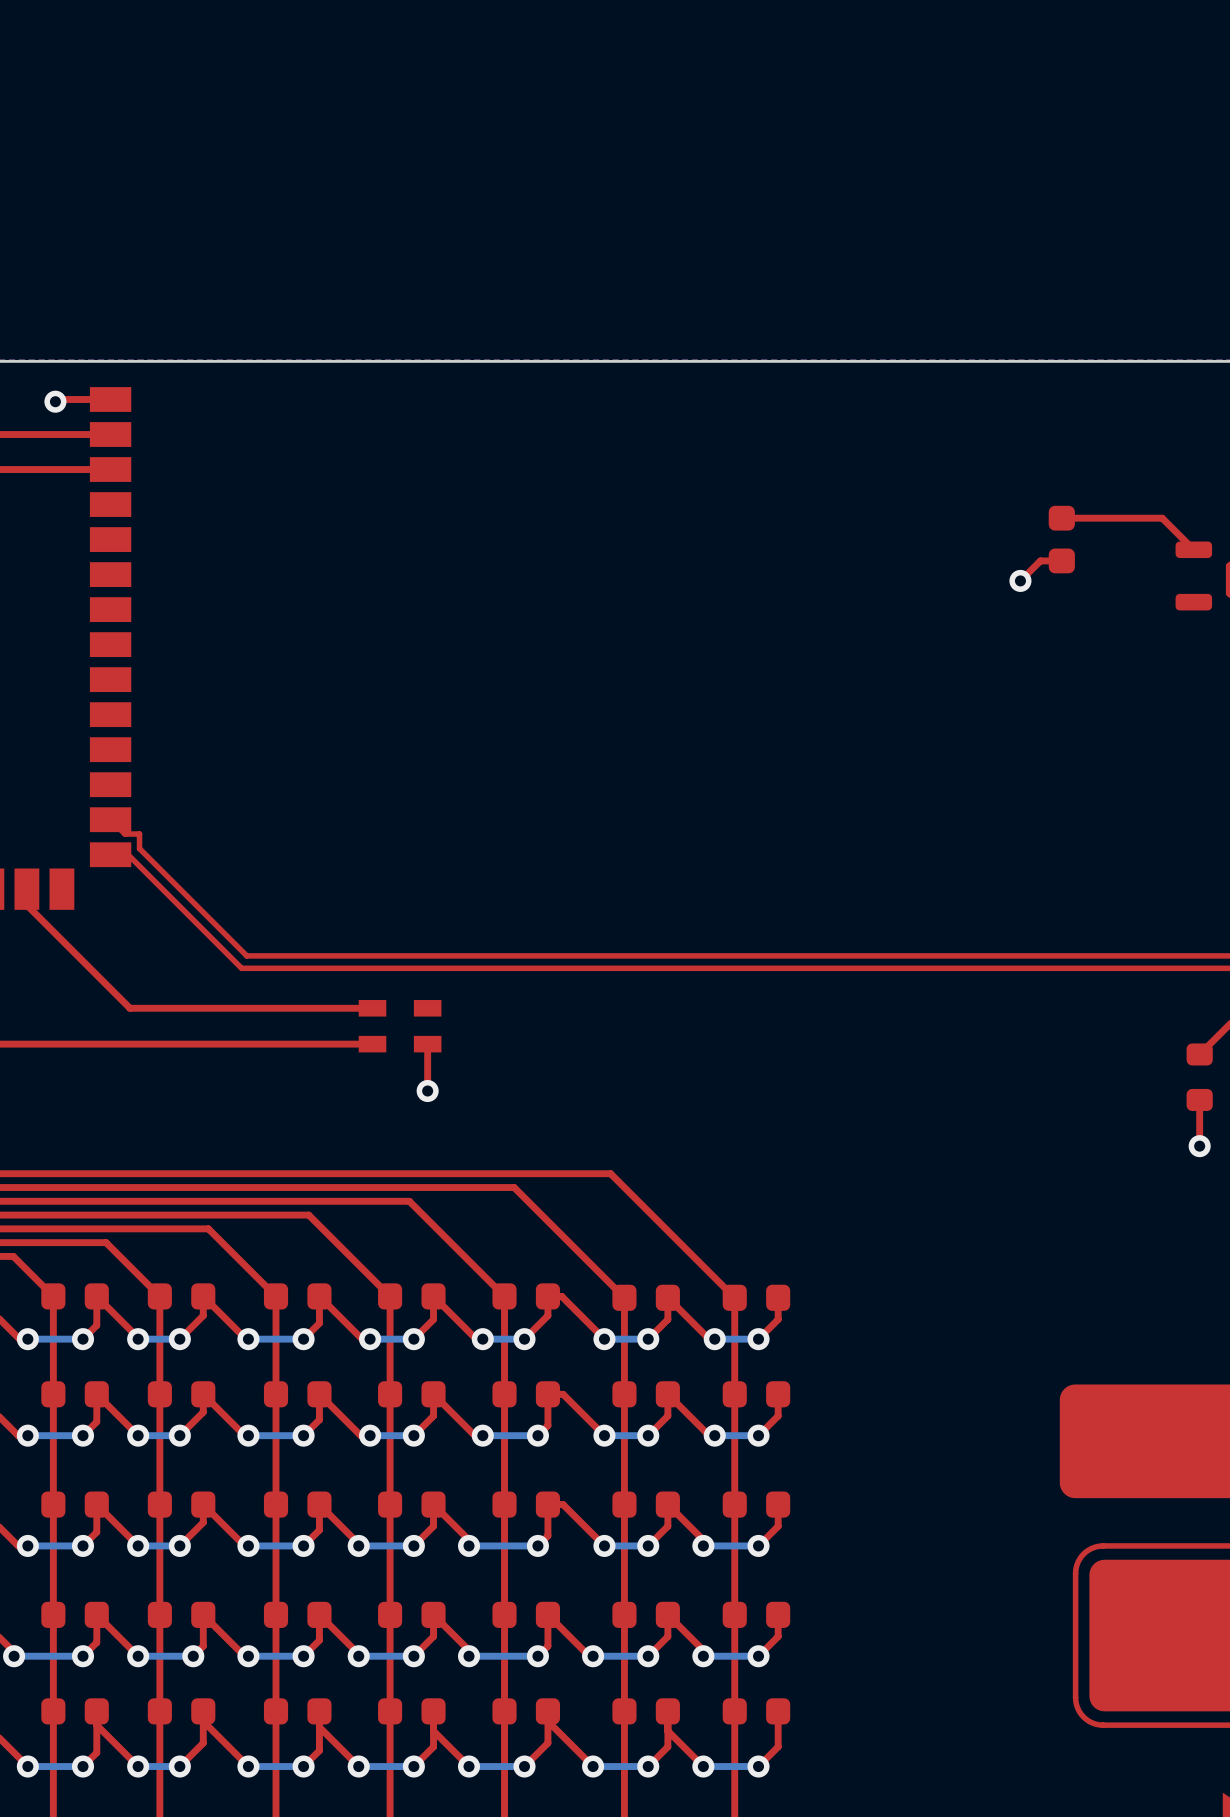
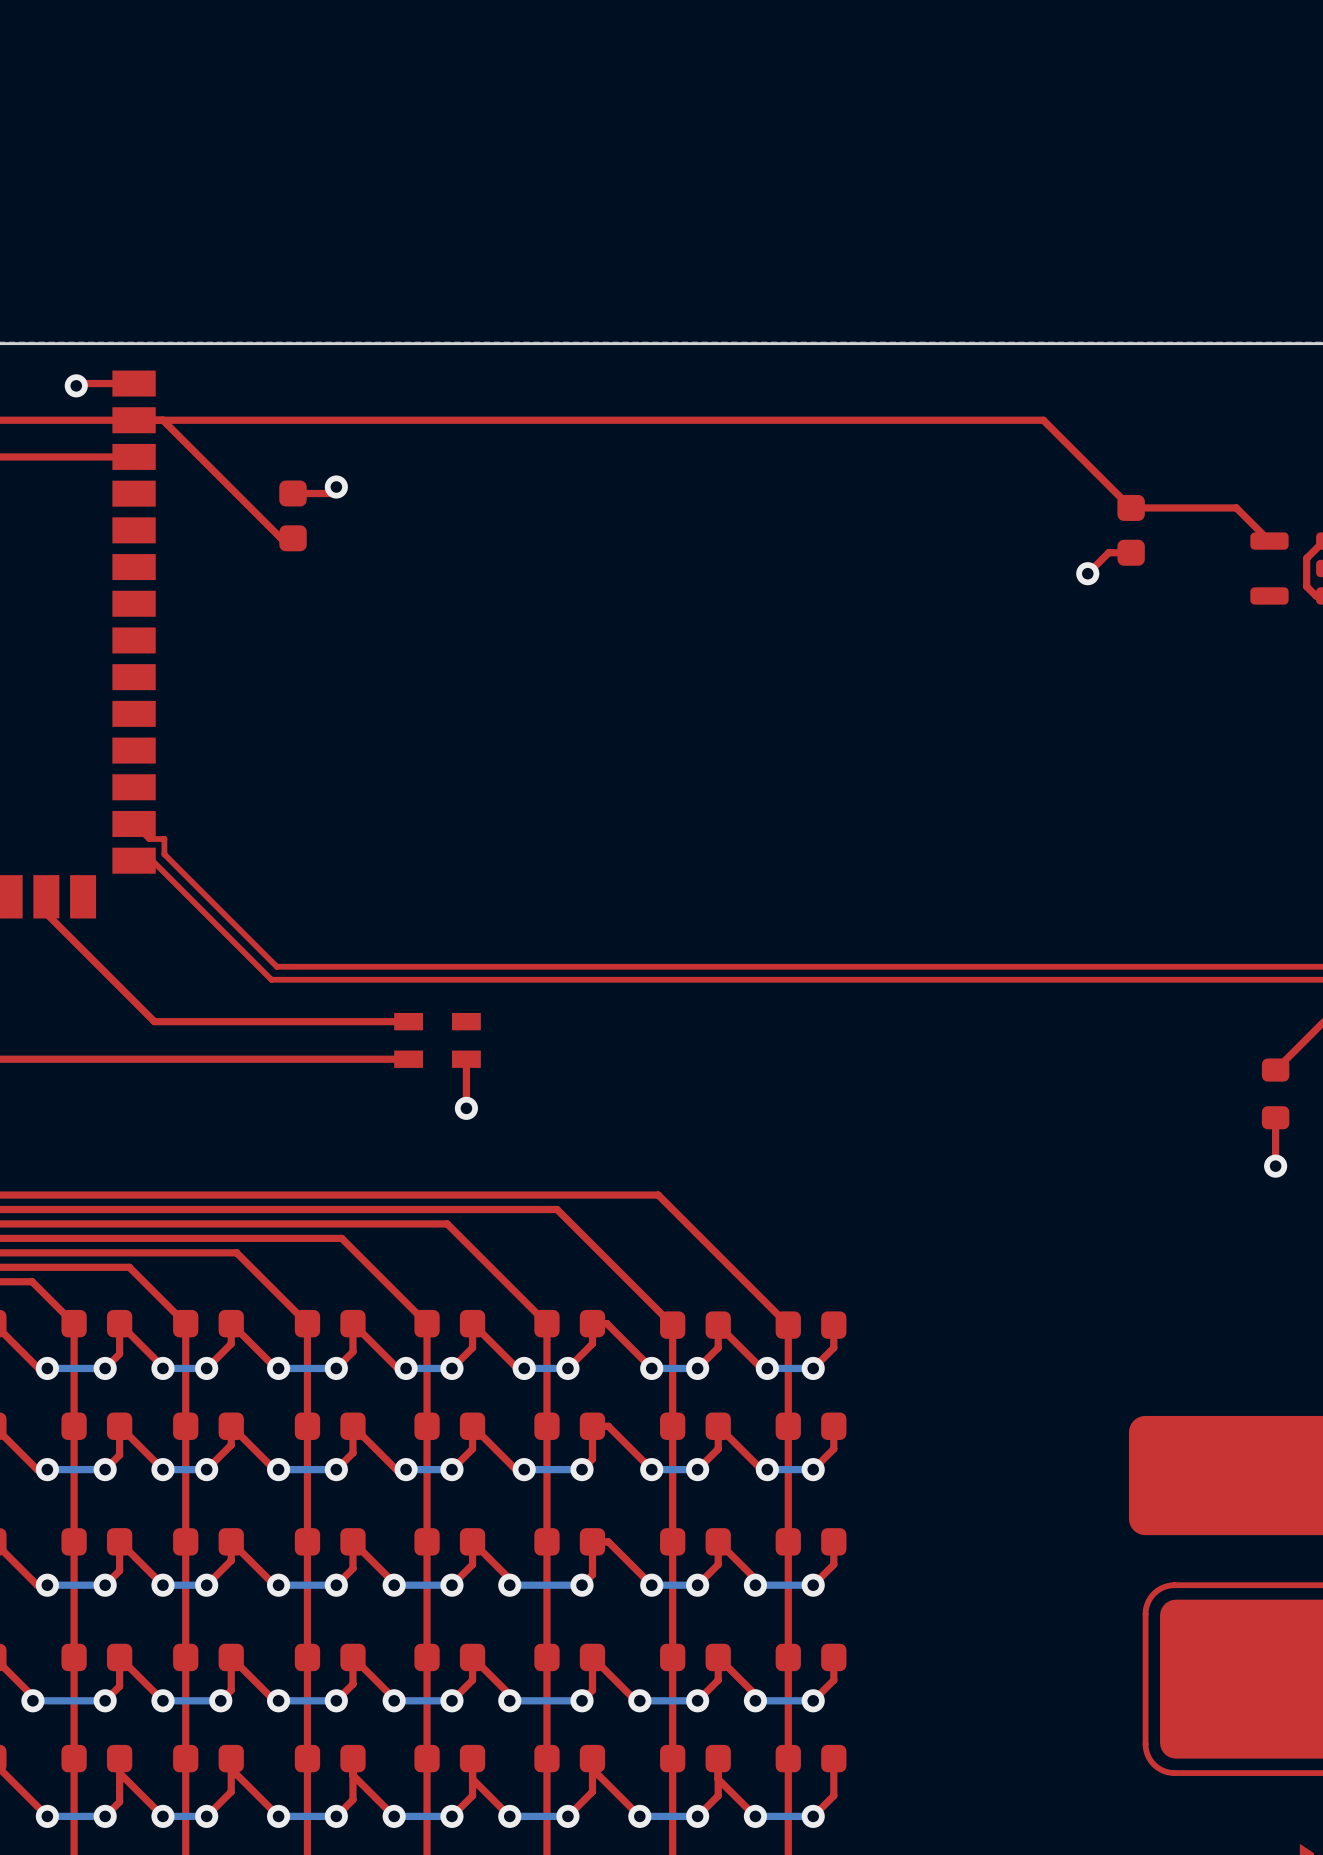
top track: none -> (134, 420) (1043, 420) (1131, 507)
top track: none -> (162, 420) (281, 538) (293, 538)
top track: none -> (336, 487) (329, 493) (293, 493)
via: none -> (336, 487)
part: none -> (293, 515)

